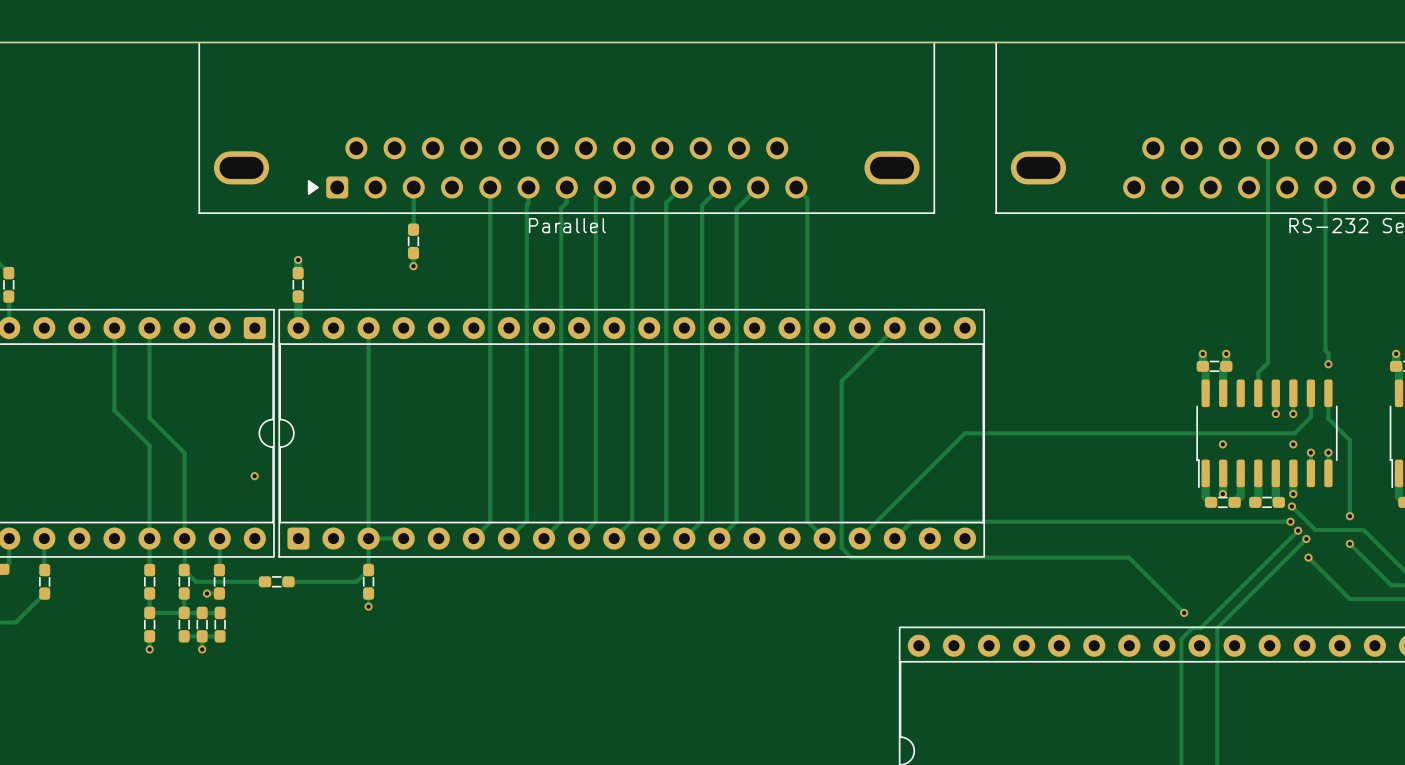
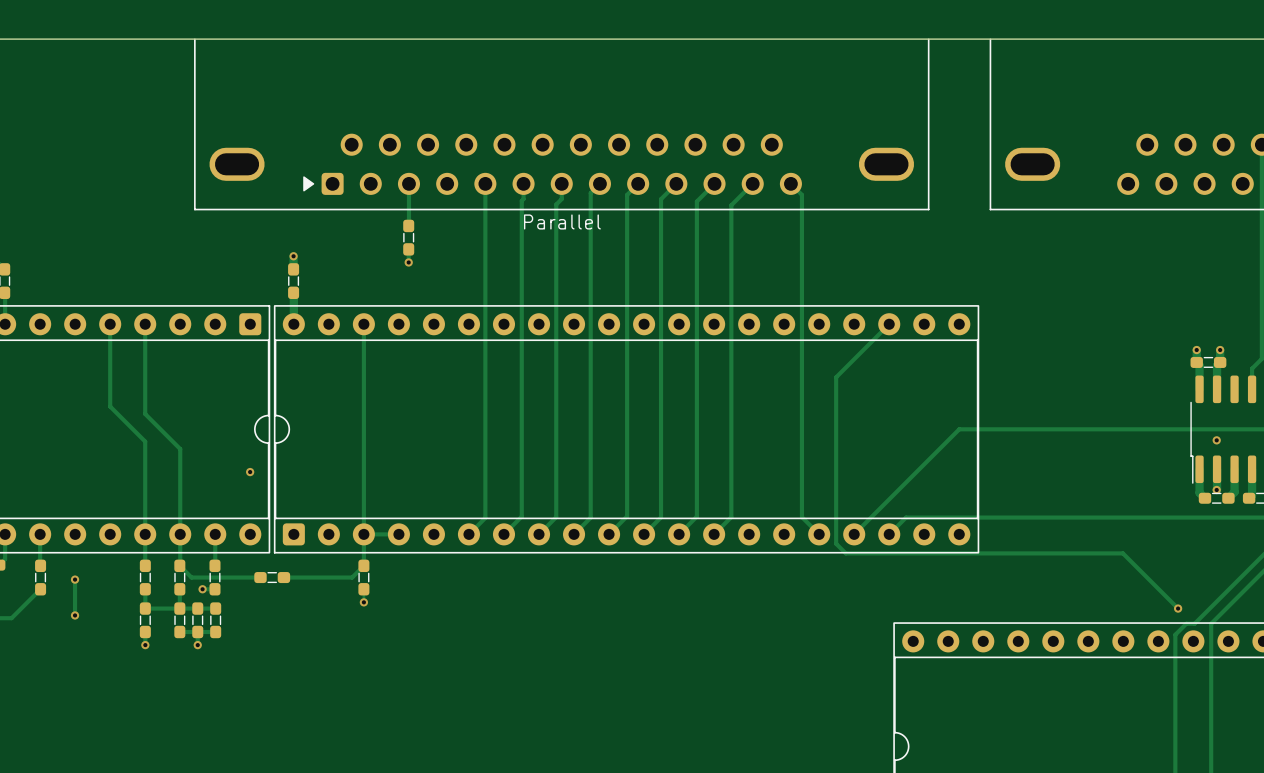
track: none -> (75, 579) (75, 615)
via: none -> (75, 579)
via: none -> (75, 615)

